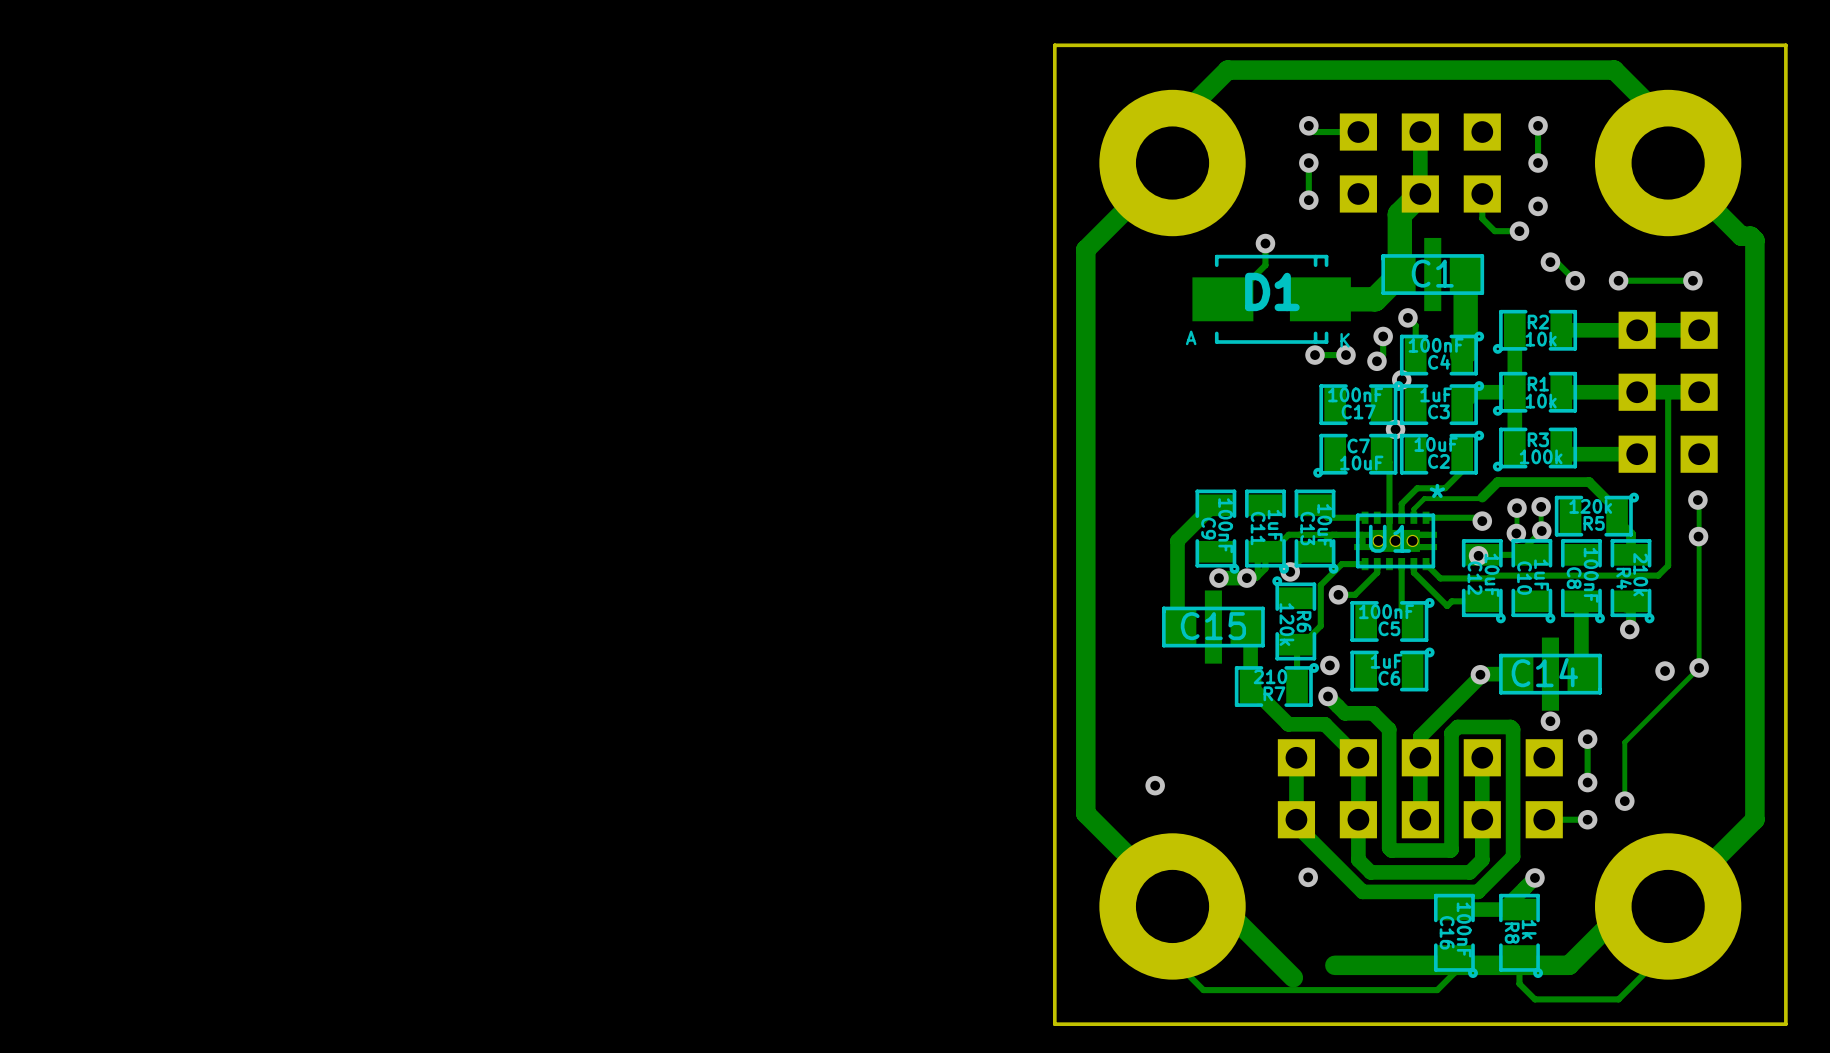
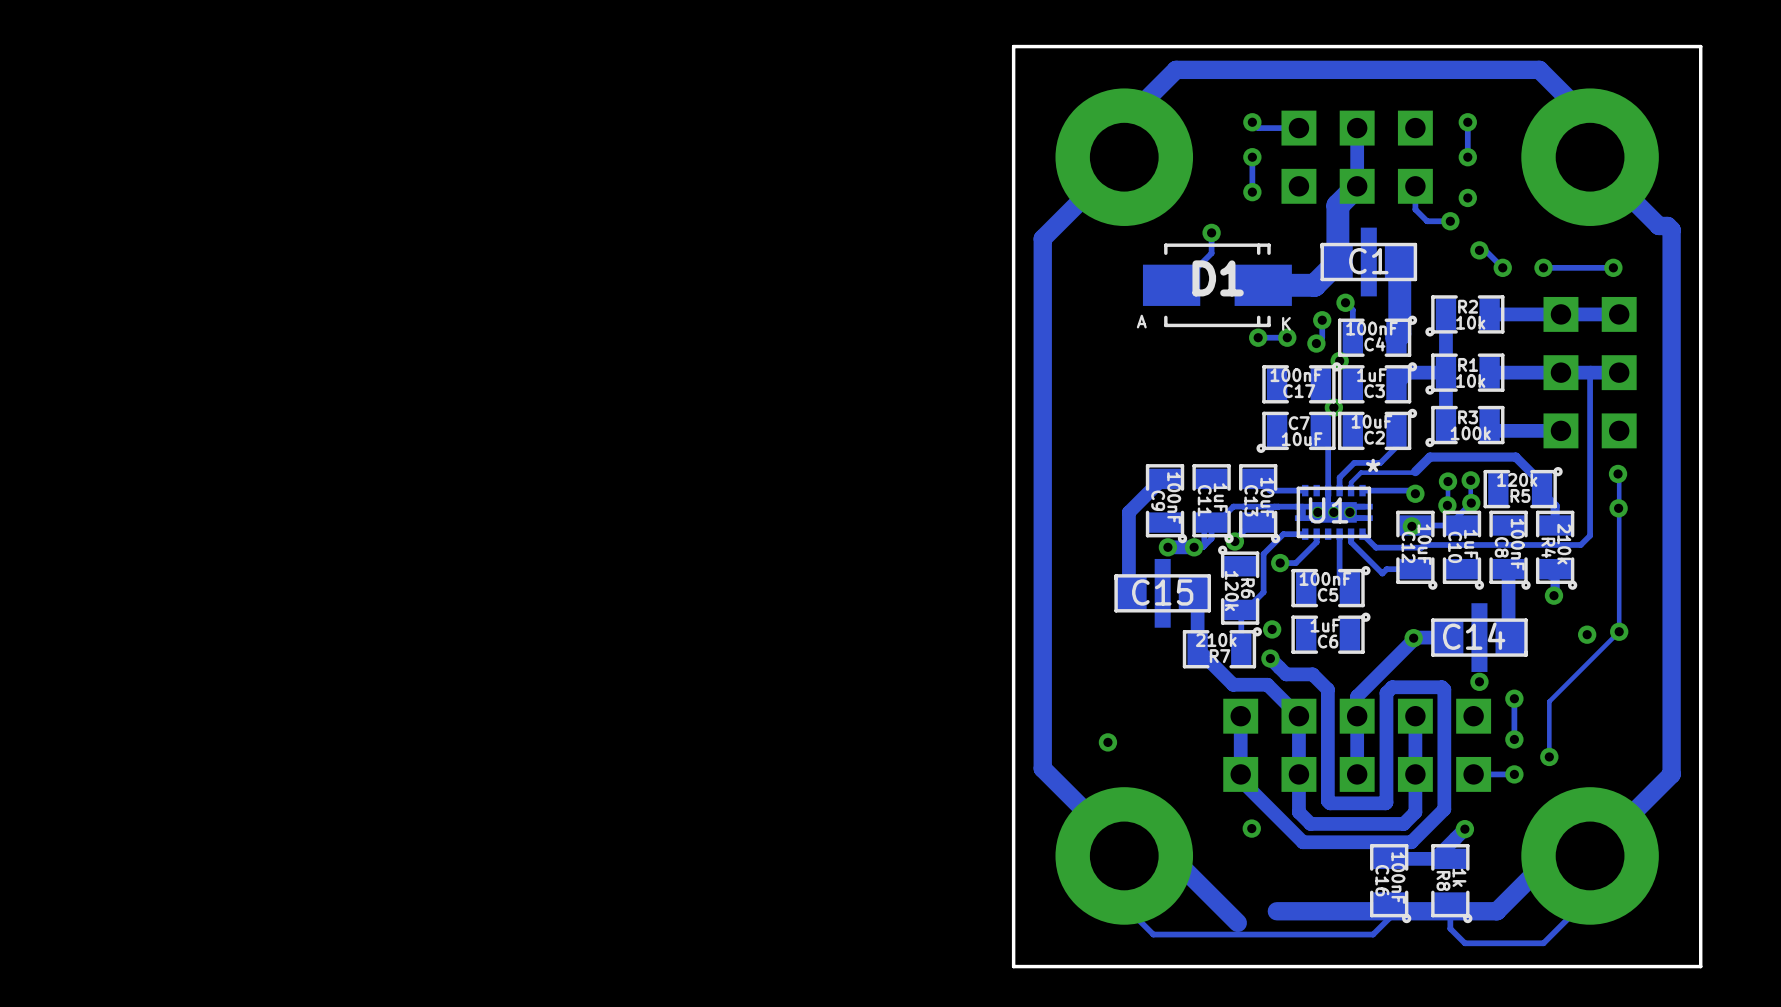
R7 value: 210 (1270, 676) -> 210k (1216, 640)

